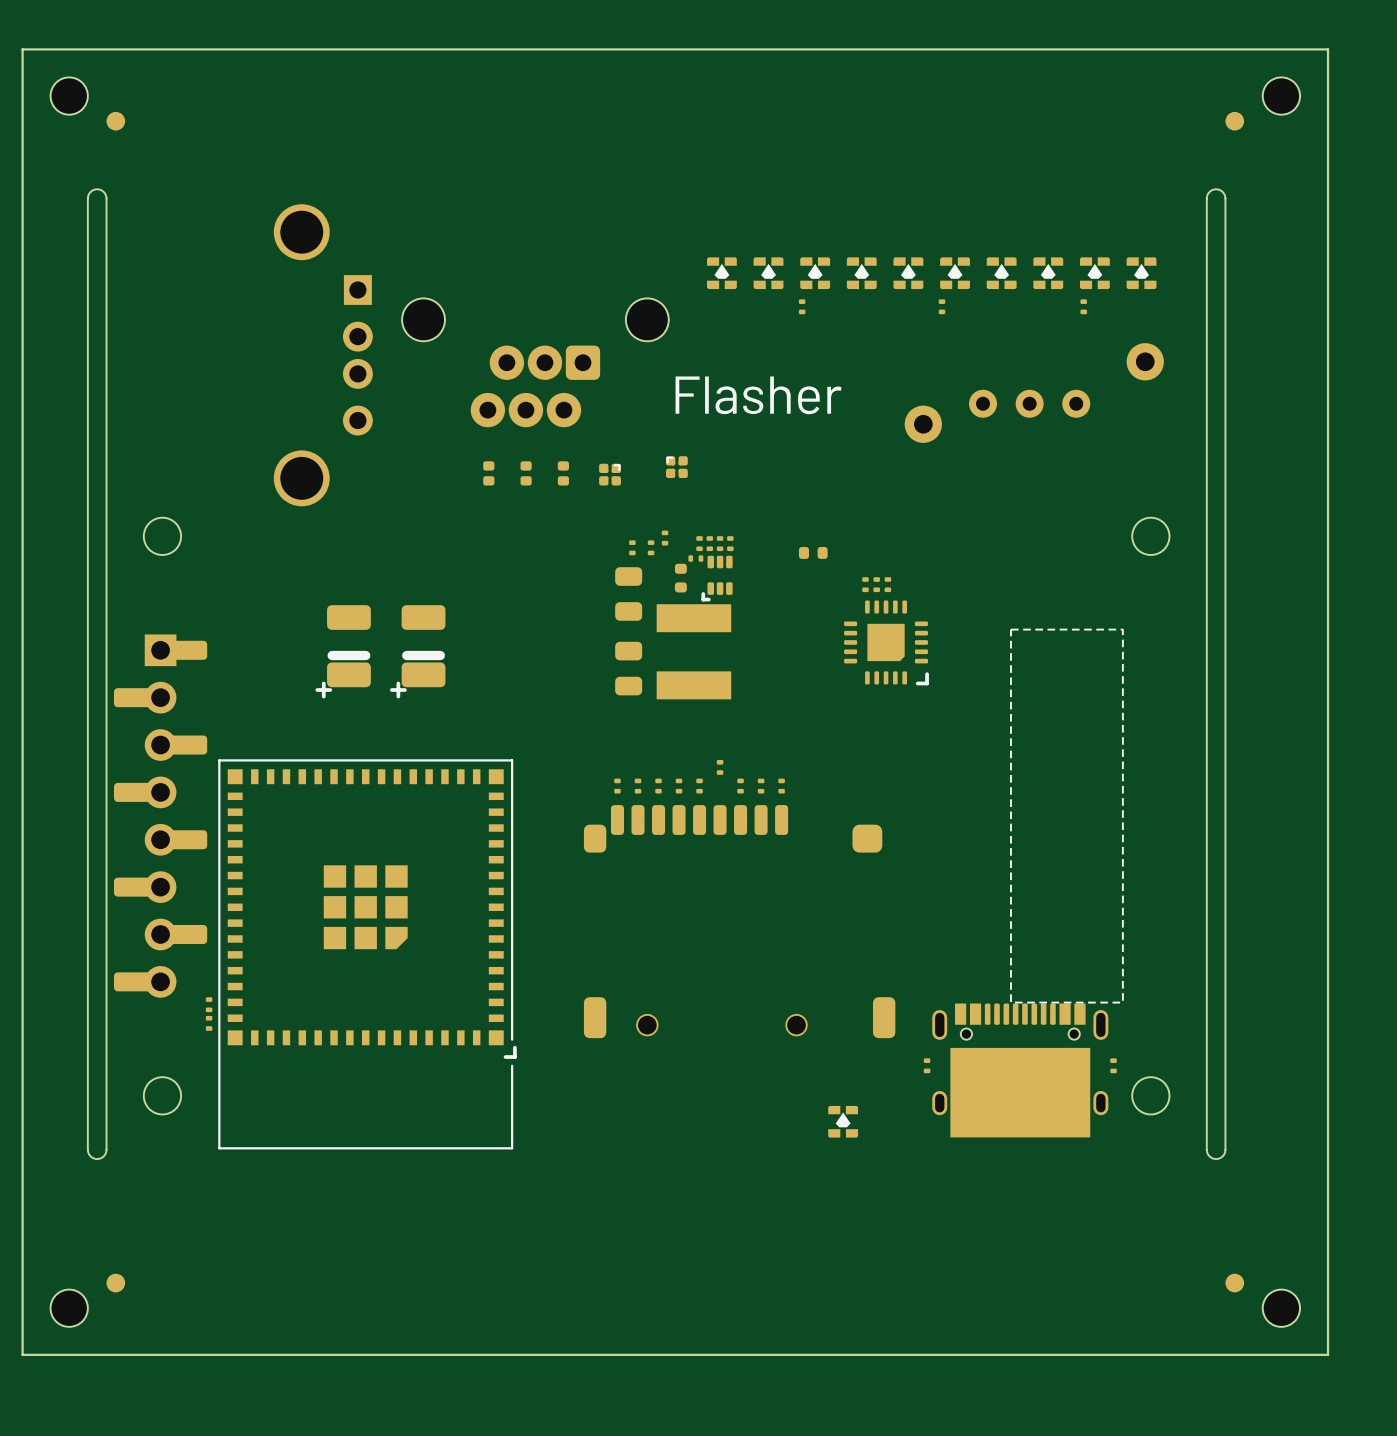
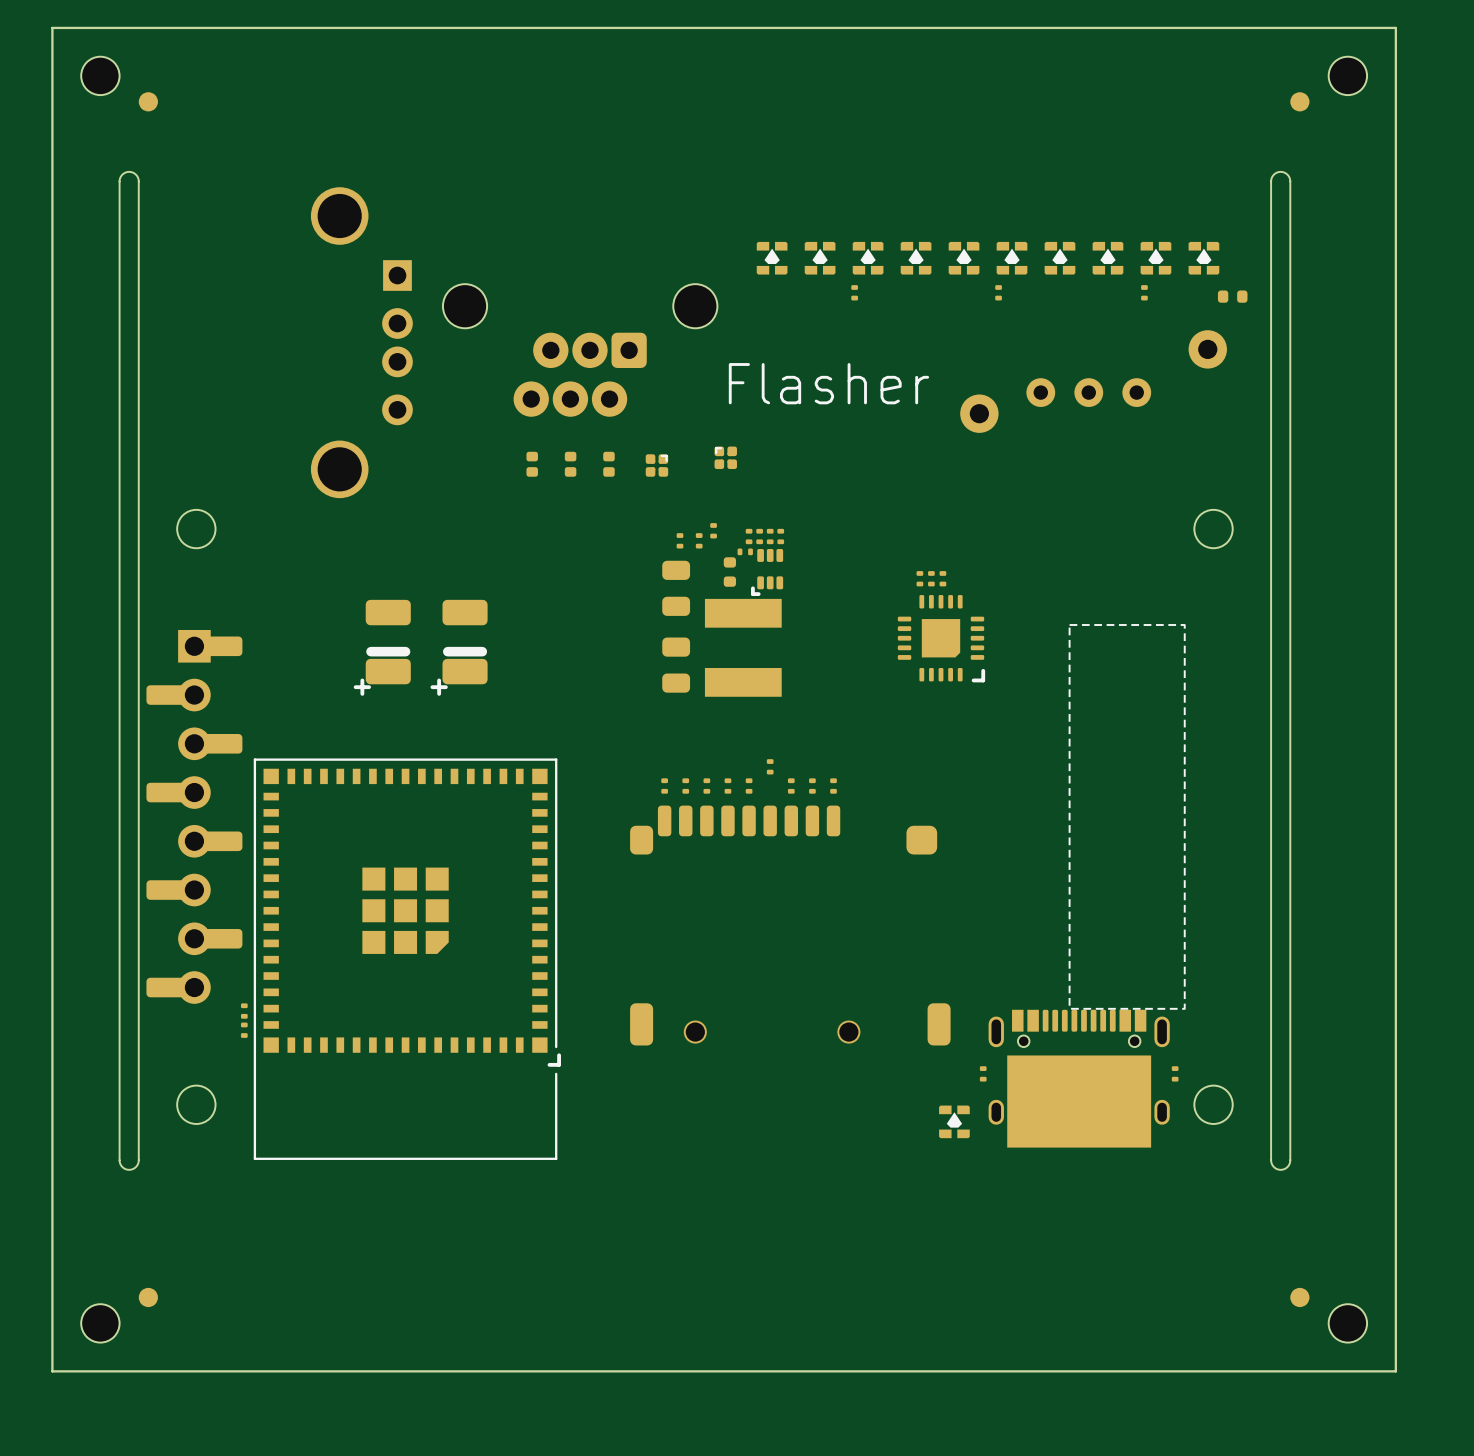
part position: (813, 552) -> (1232, 296)
part position: (843, 1121) -> (954, 1121)

